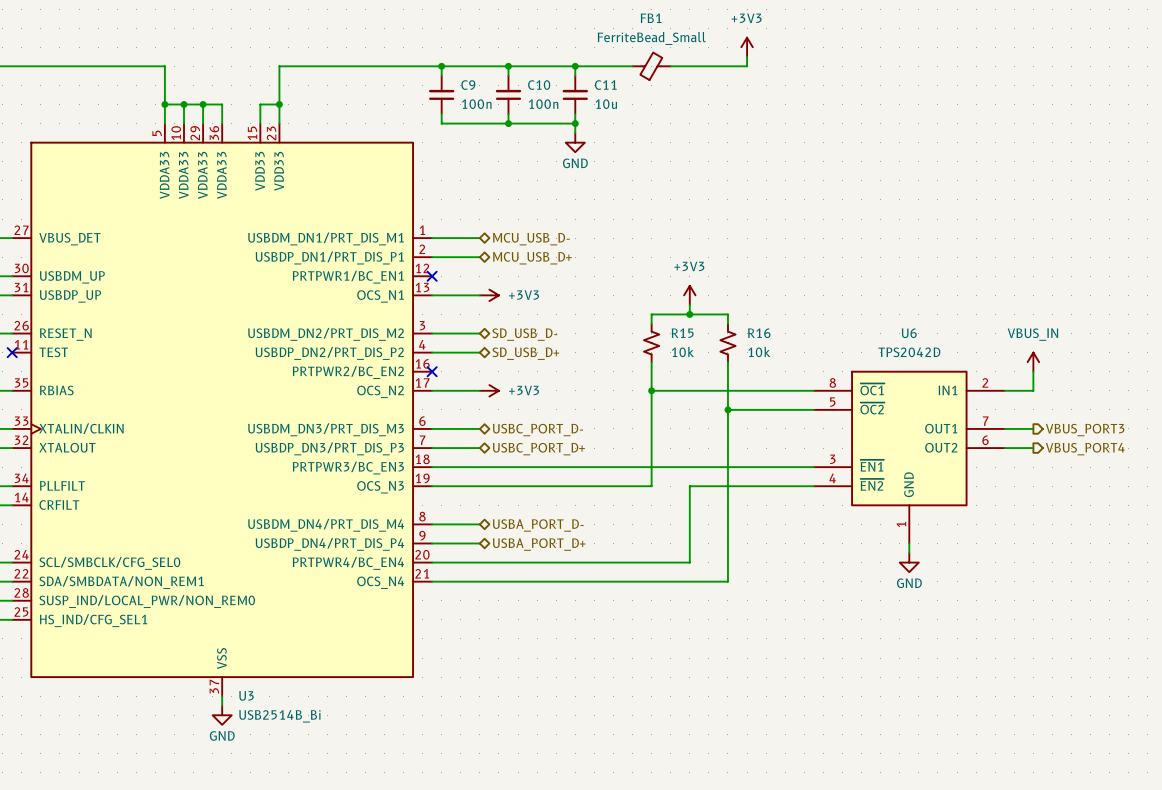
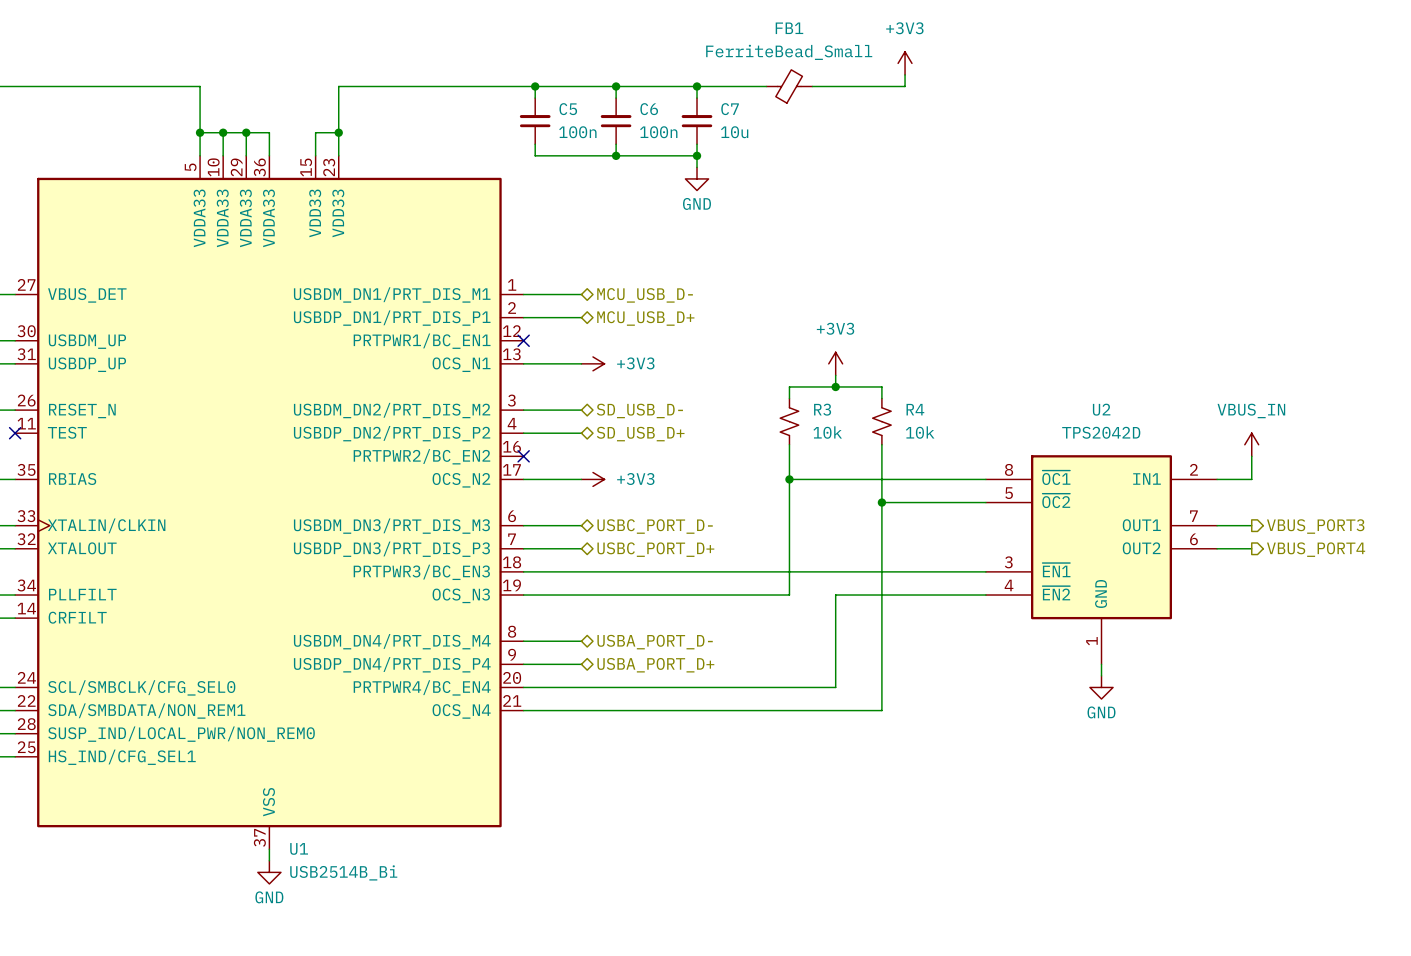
C9 name: C9 (468, 85) -> C5 (568, 109)
C10 name: C10 (539, 85) -> C6 (649, 109)
C11 name: C11 (605, 85) -> C7 (730, 109)
R15 name: R15 (682, 333) -> R3 (822, 409)
R16 name: R16 (759, 333) -> R4 (915, 409)
U6 name: U6 (909, 333) -> U2 (1101, 409)
U3 name: U3 (246, 695) -> U1 (299, 848)

